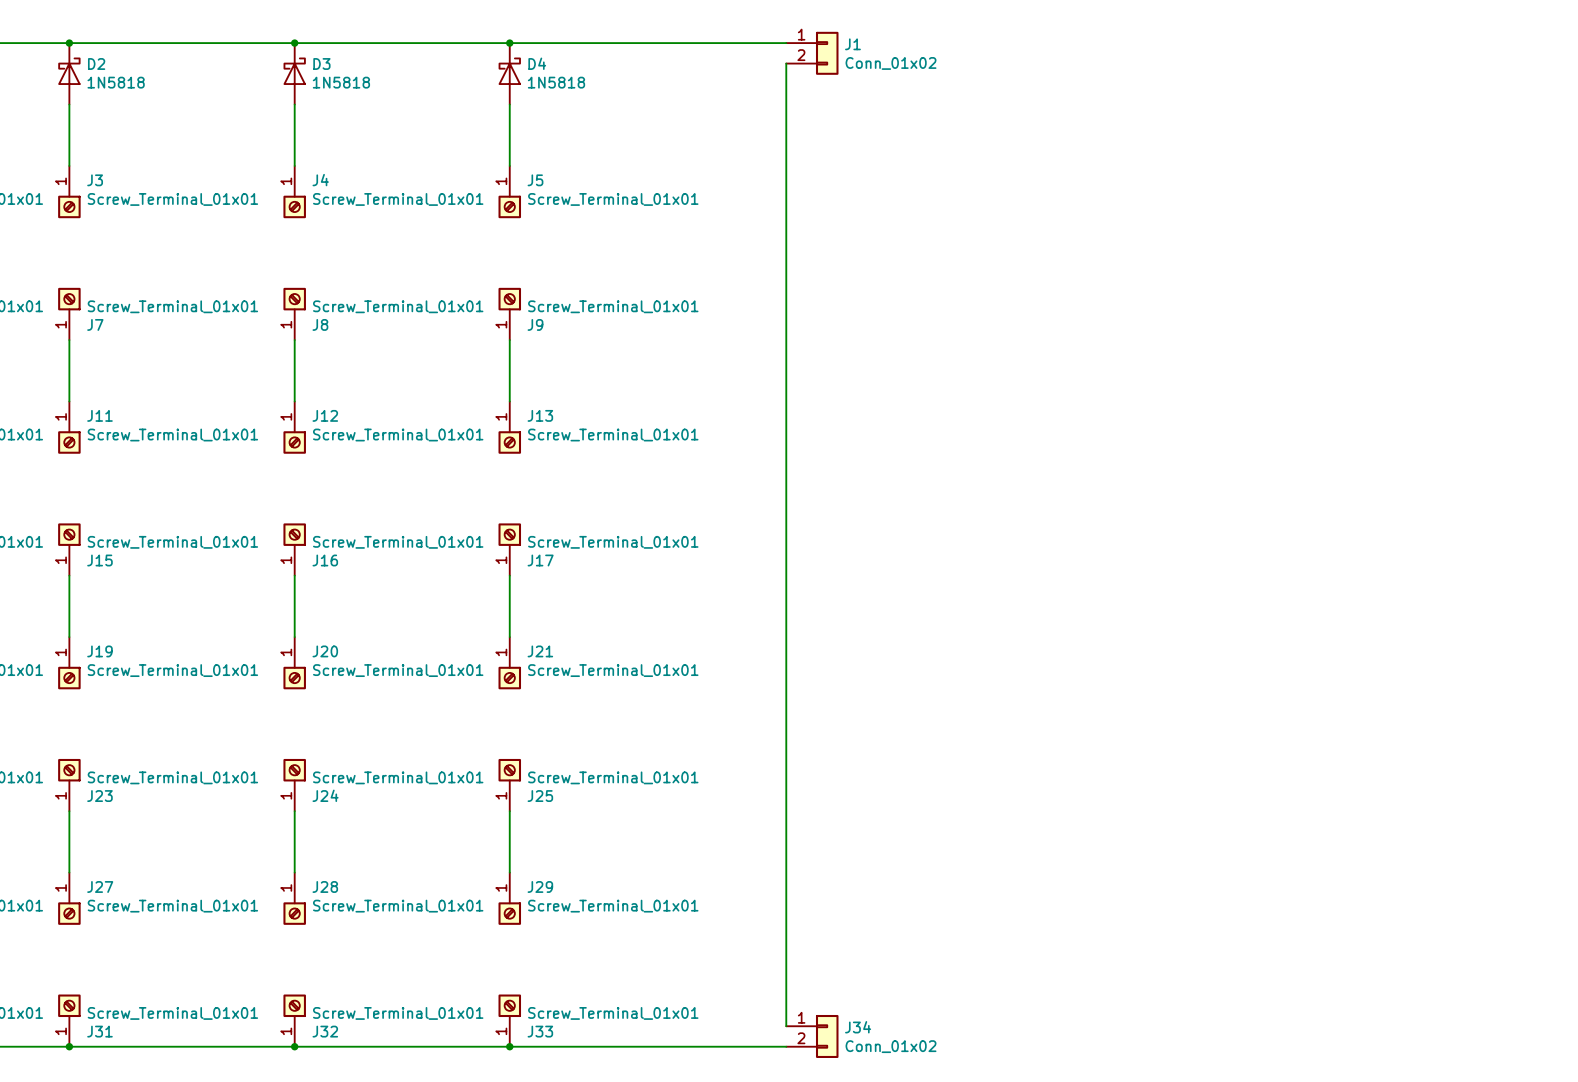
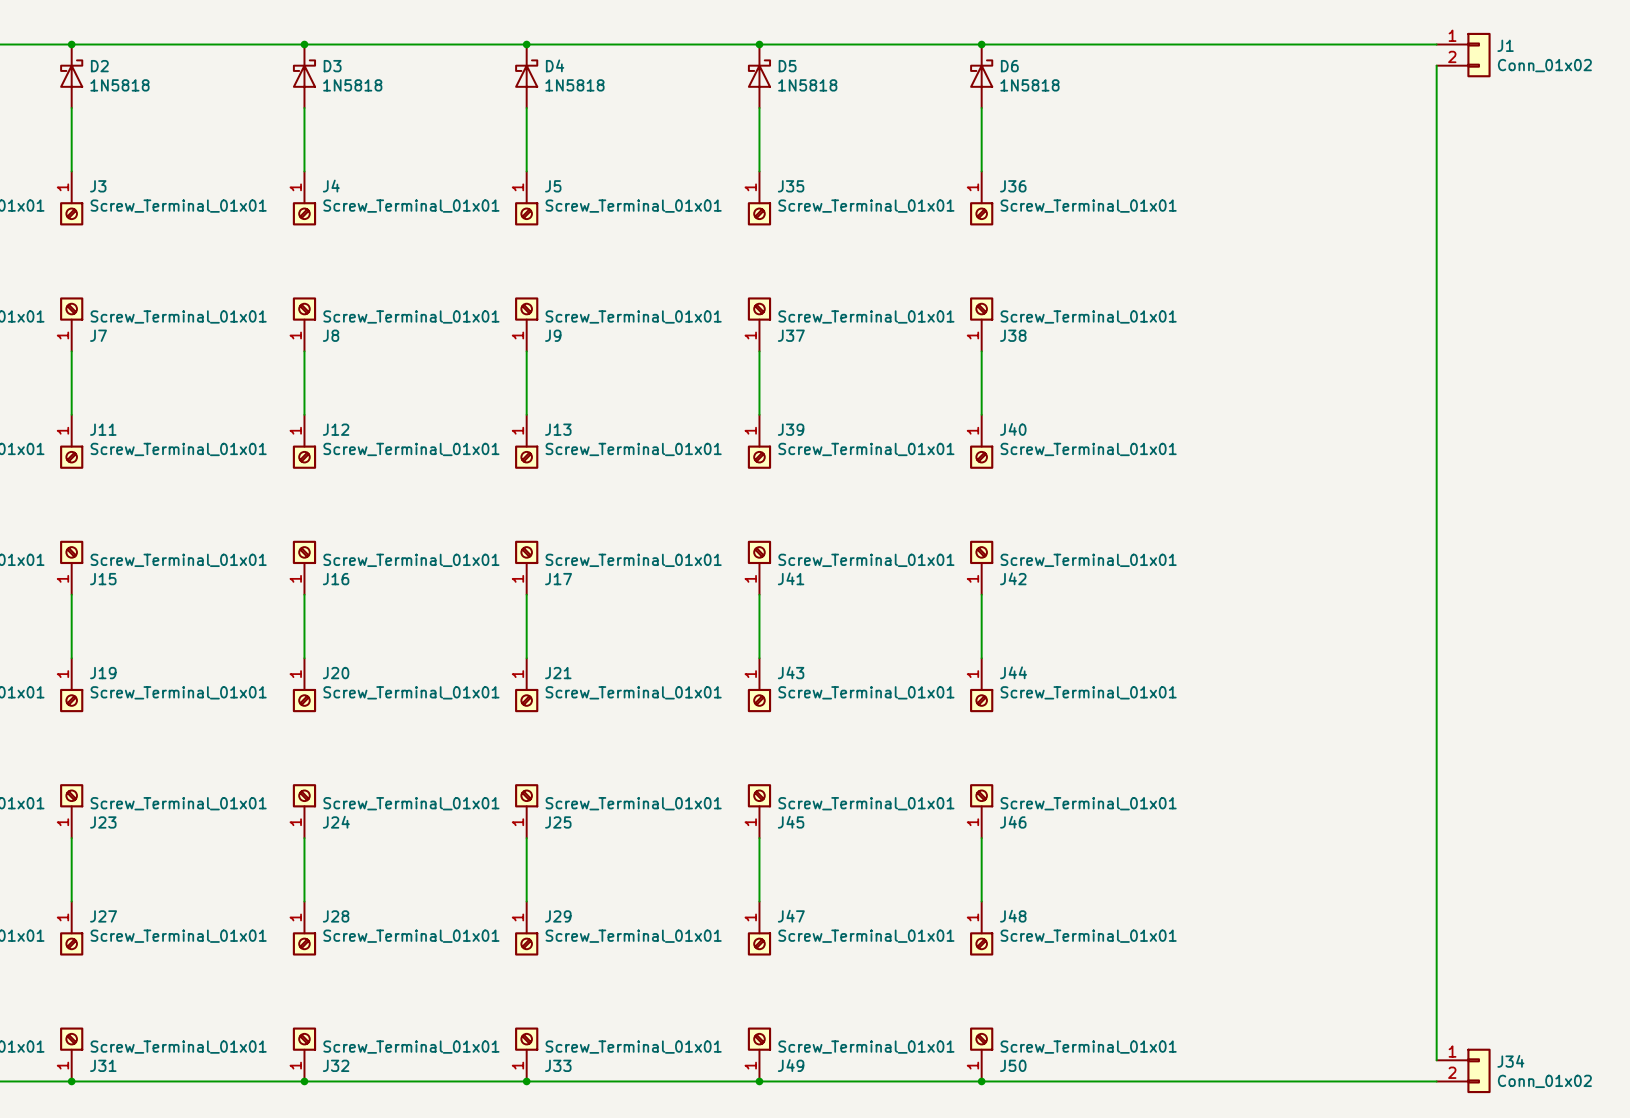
junction: none -> (759, 44)
wire: none -> (812, 44) (1436, 44)
junction: none -> (981, 44)
J1 position: (812, 53) -> (1463, 55)
wire: (786, 63) (786, 1026) -> none
wire: none -> (1436, 65) (1436, 1060)
D5: none -> 1N5818 (759, 76)
D6: none -> 1N5818 (981, 76)
wire: none -> (759, 107) (759, 171)
wire: none -> (981, 107) (981, 171)
J35: none -> Screw_Terminal_01x01 (759, 198)
J36: none -> Screw_Terminal_01x01 (981, 198)
J37: none -> Screw_Terminal_01x01 (759, 324)
J38: none -> Screw_Terminal_01x01 (981, 324)
wire: none -> (759, 351) (759, 414)
wire: none -> (981, 351) (981, 414)
J39: none -> Screw_Terminal_01x01 (759, 441)
J40: none -> Screw_Terminal_01x01 (981, 441)
J41: none -> Screw_Terminal_01x01 (759, 567)
J42: none -> Screw_Terminal_01x01 (981, 567)
wire: none -> (759, 594) (759, 658)
wire: none -> (981, 594) (981, 658)
J43: none -> Screw_Terminal_01x01 (759, 685)
J44: none -> Screw_Terminal_01x01 (981, 685)
J45: none -> Screw_Terminal_01x01 (759, 811)
J46: none -> Screw_Terminal_01x01 (981, 811)
wire: none -> (759, 838) (759, 901)
wire: none -> (981, 838) (981, 901)
J47: none -> Screw_Terminal_01x01 (759, 928)
J48: none -> Screw_Terminal_01x01 (981, 928)
J49: none -> Screw_Terminal_01x01 (759, 1054)
J50: none -> Screw_Terminal_01x01 (981, 1054)
J34 position: (812, 1036) -> (1463, 1070)
junction: none -> (759, 1081)
wire: none -> (812, 1081) (1436, 1081)
junction: none -> (981, 1081)

